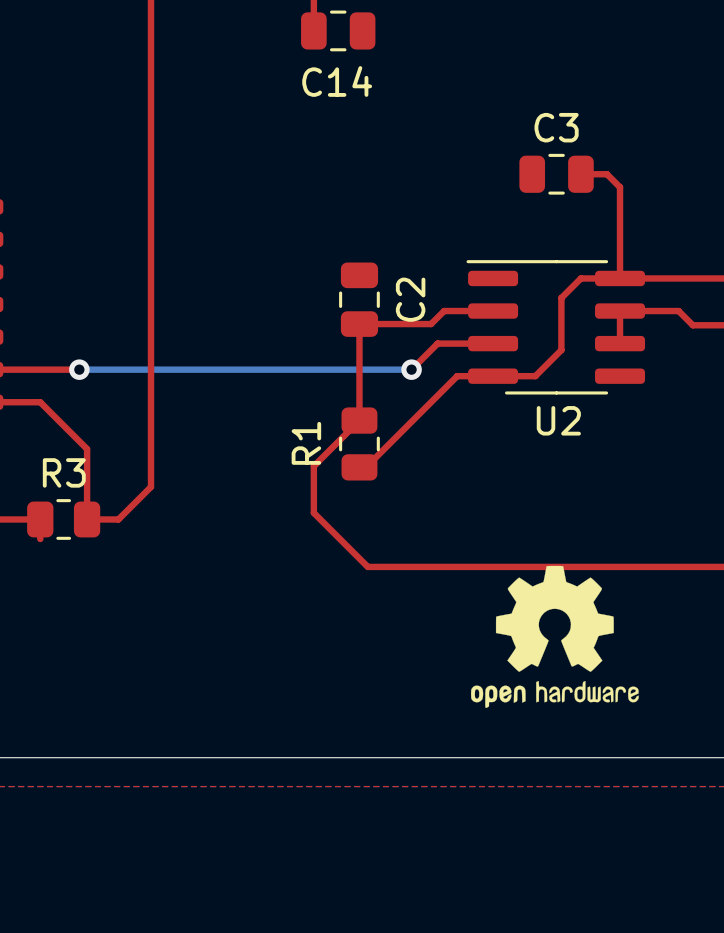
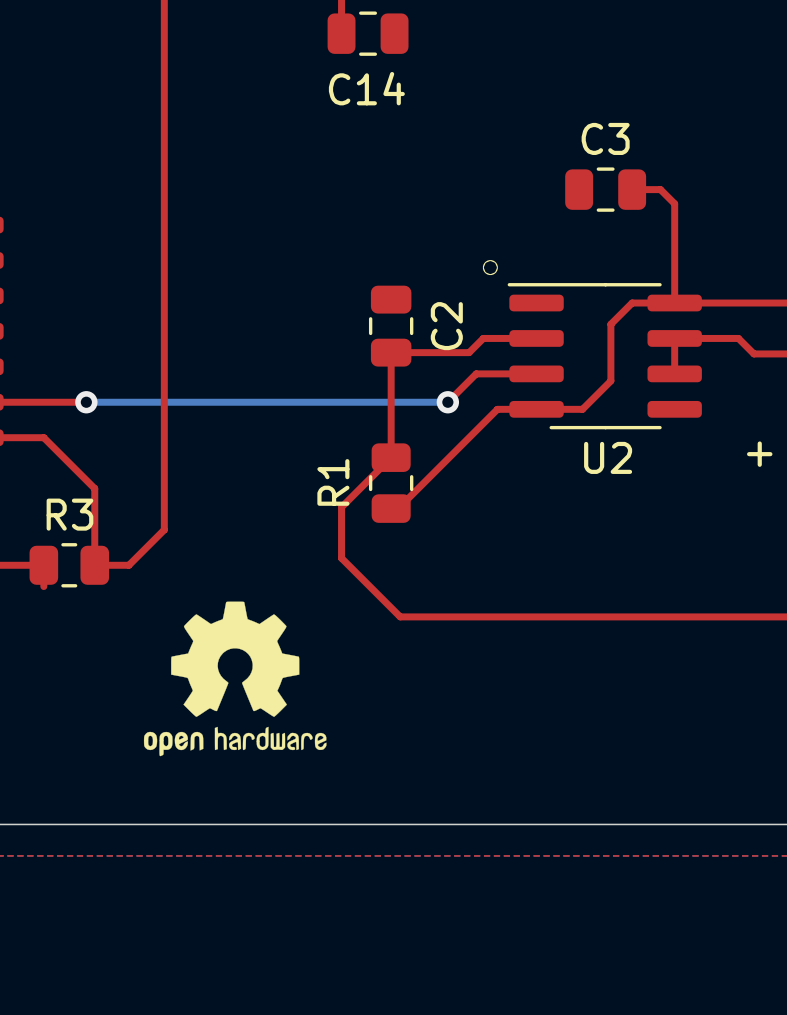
drawing: none -> [482, 260, 498, 276]
text: none -> + (759, 454)
drawing position: (554, 636) -> (235, 678)

